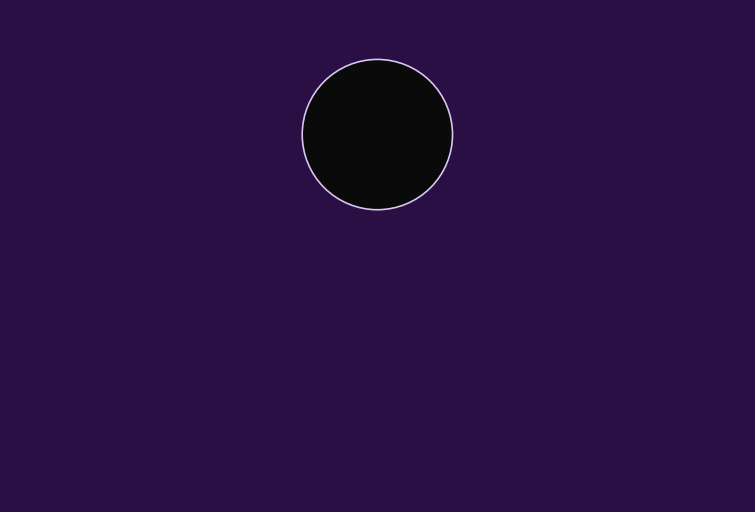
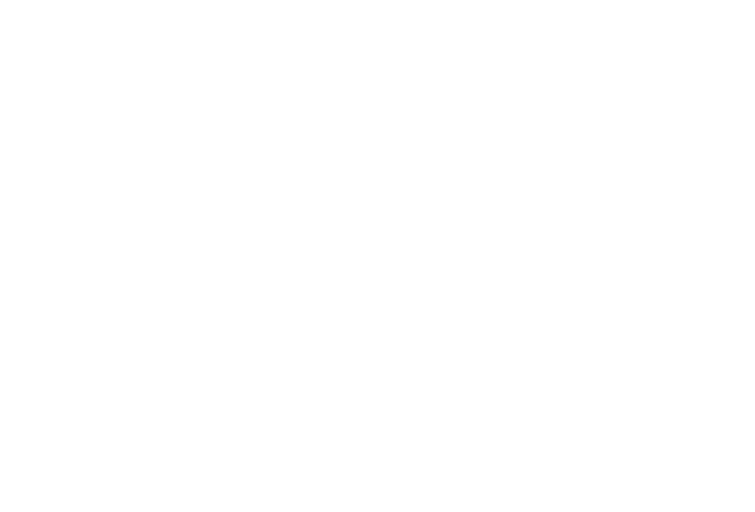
part: (377, 134) -> none

